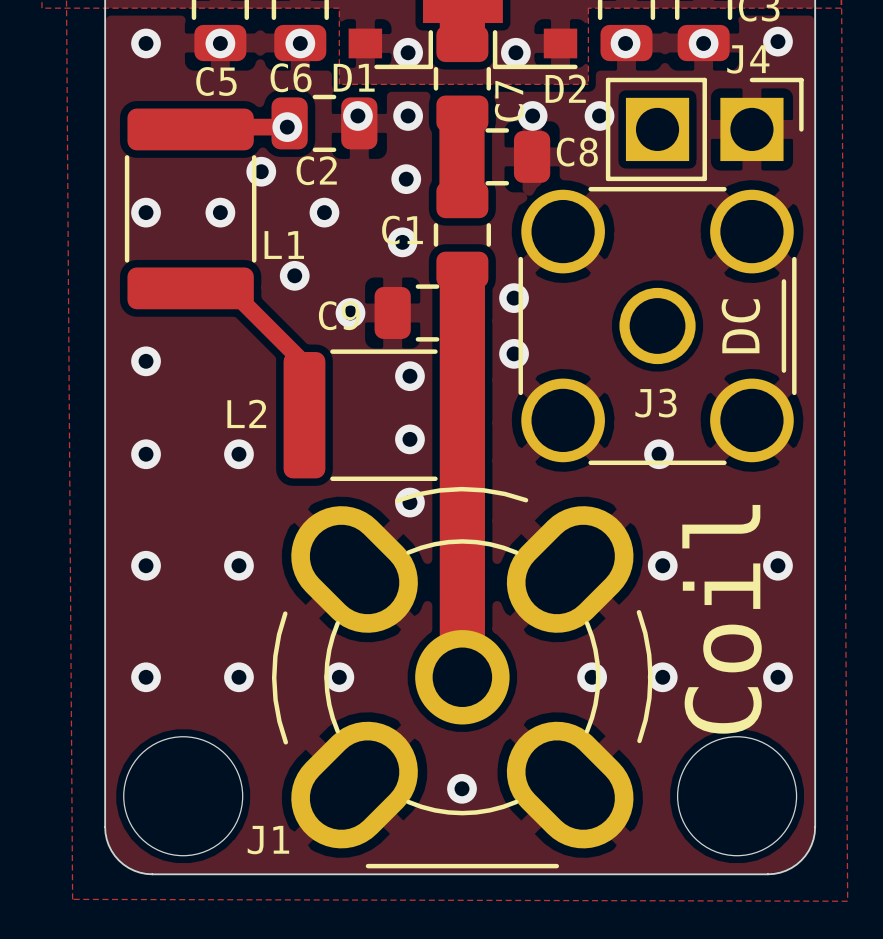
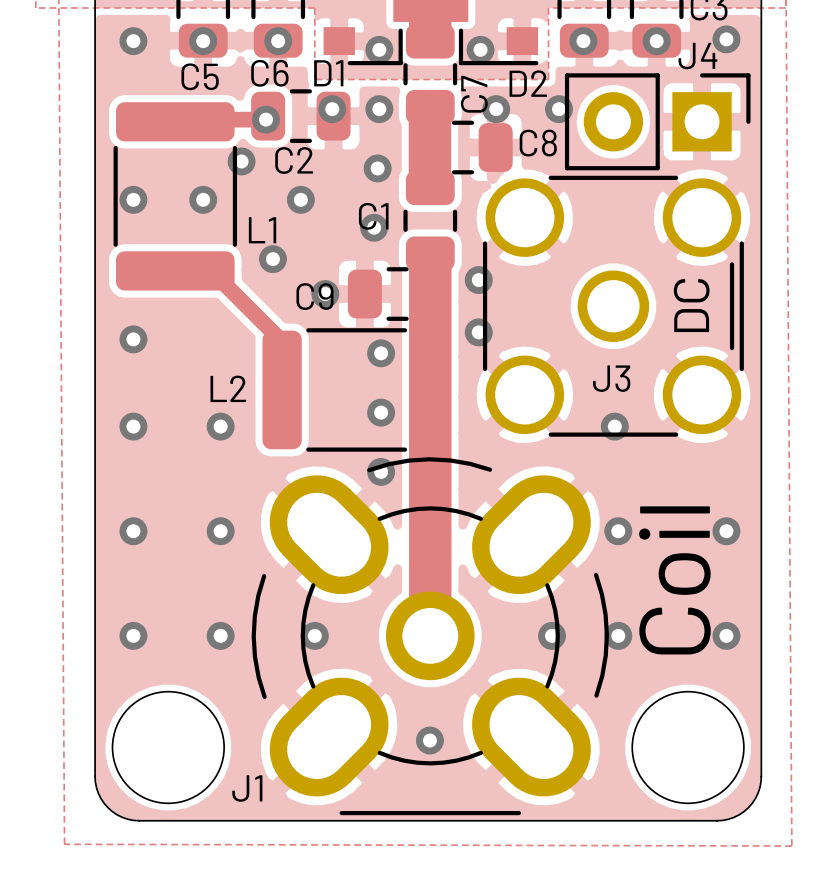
J4 footprint: [605, 77, 804, 182] -> [564, 73, 751, 171]

